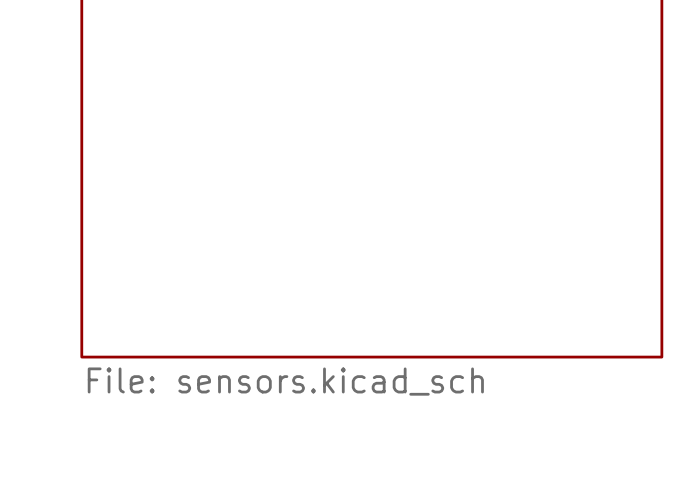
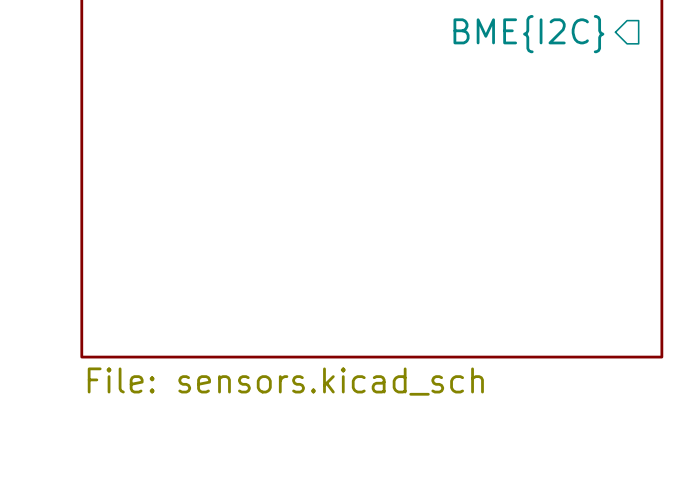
sheet pin: none -> BME{I2C} (528, 34)

